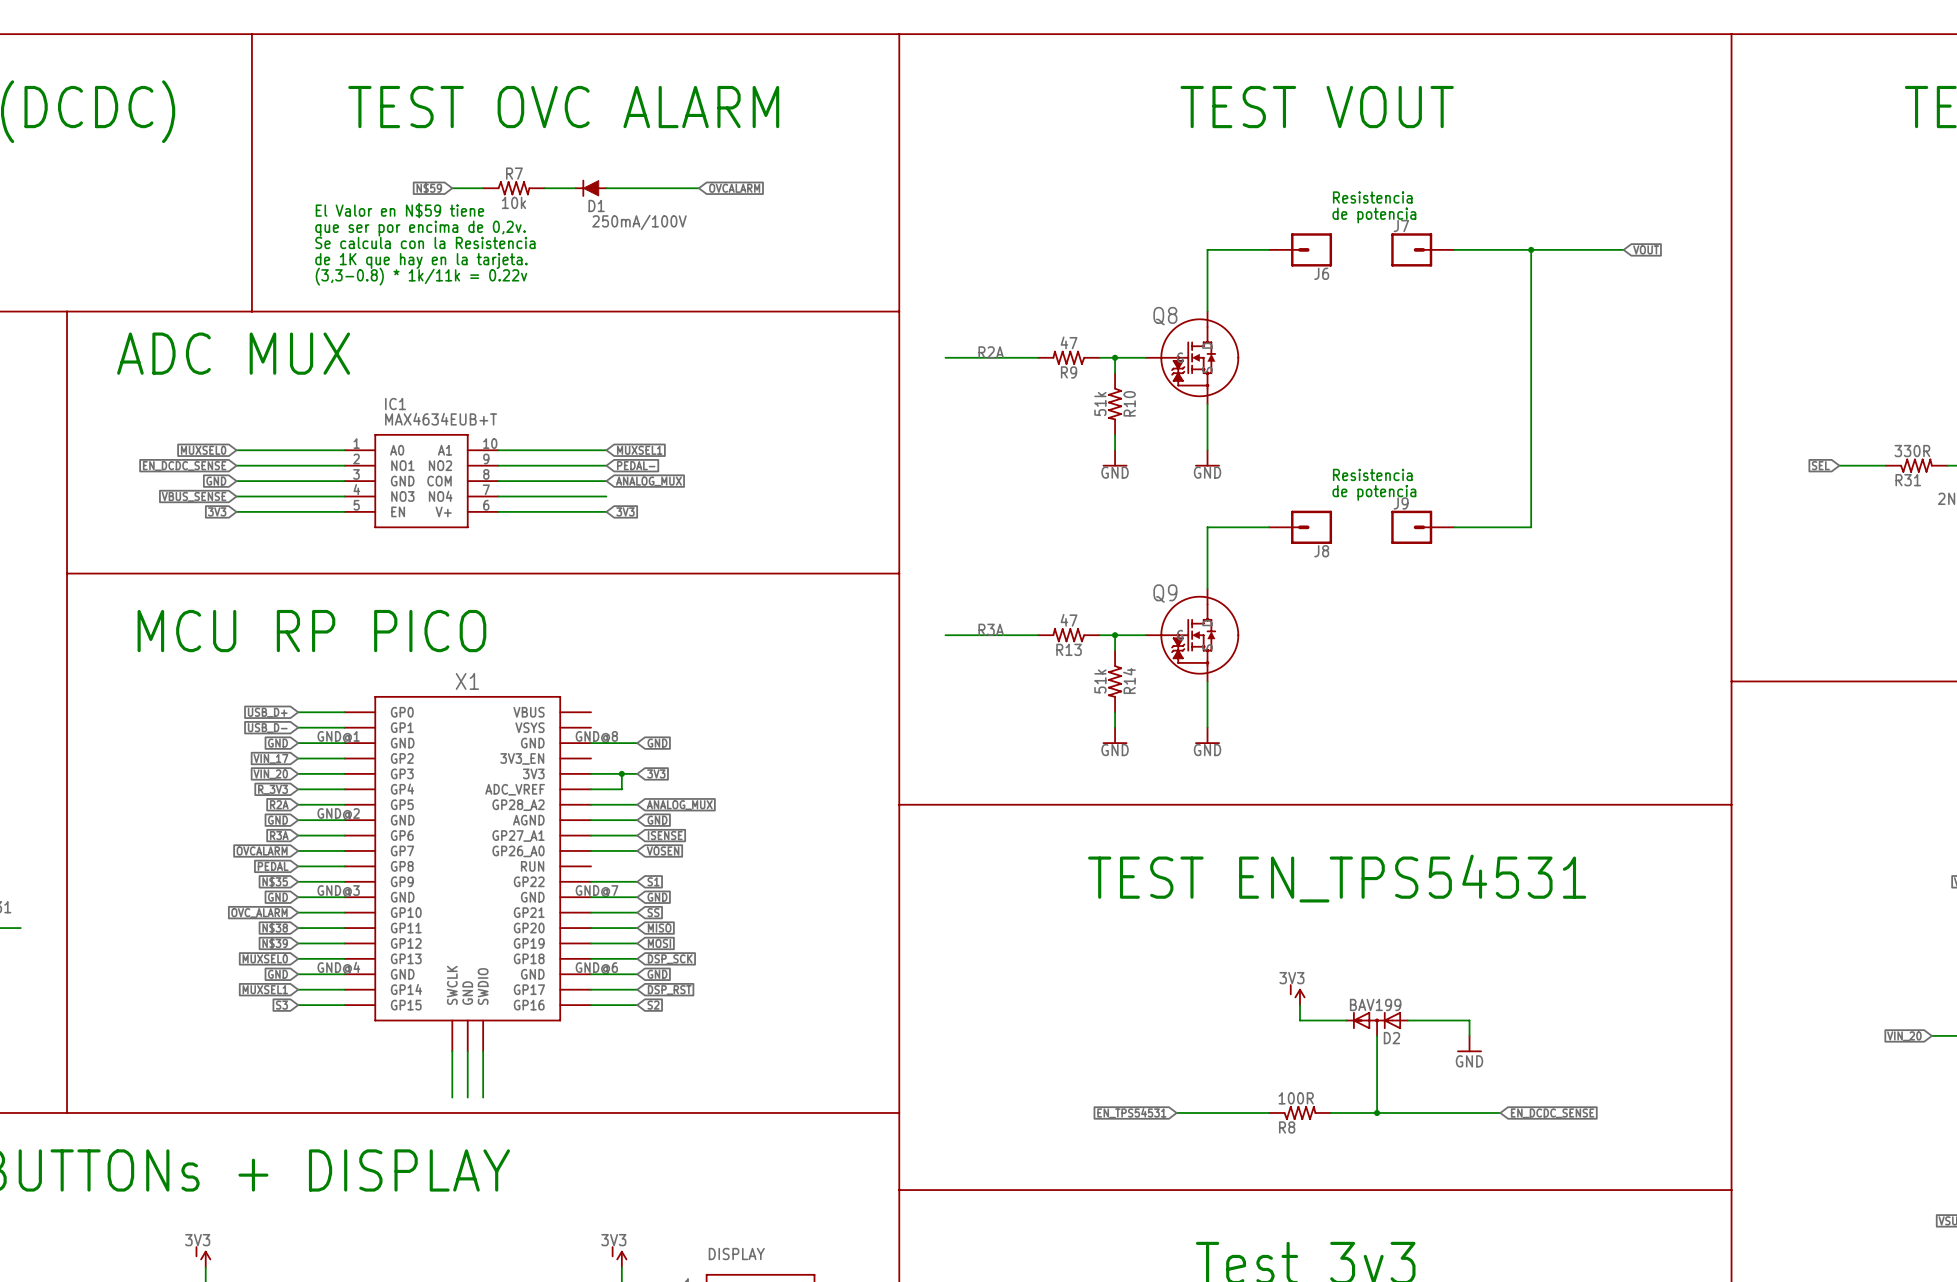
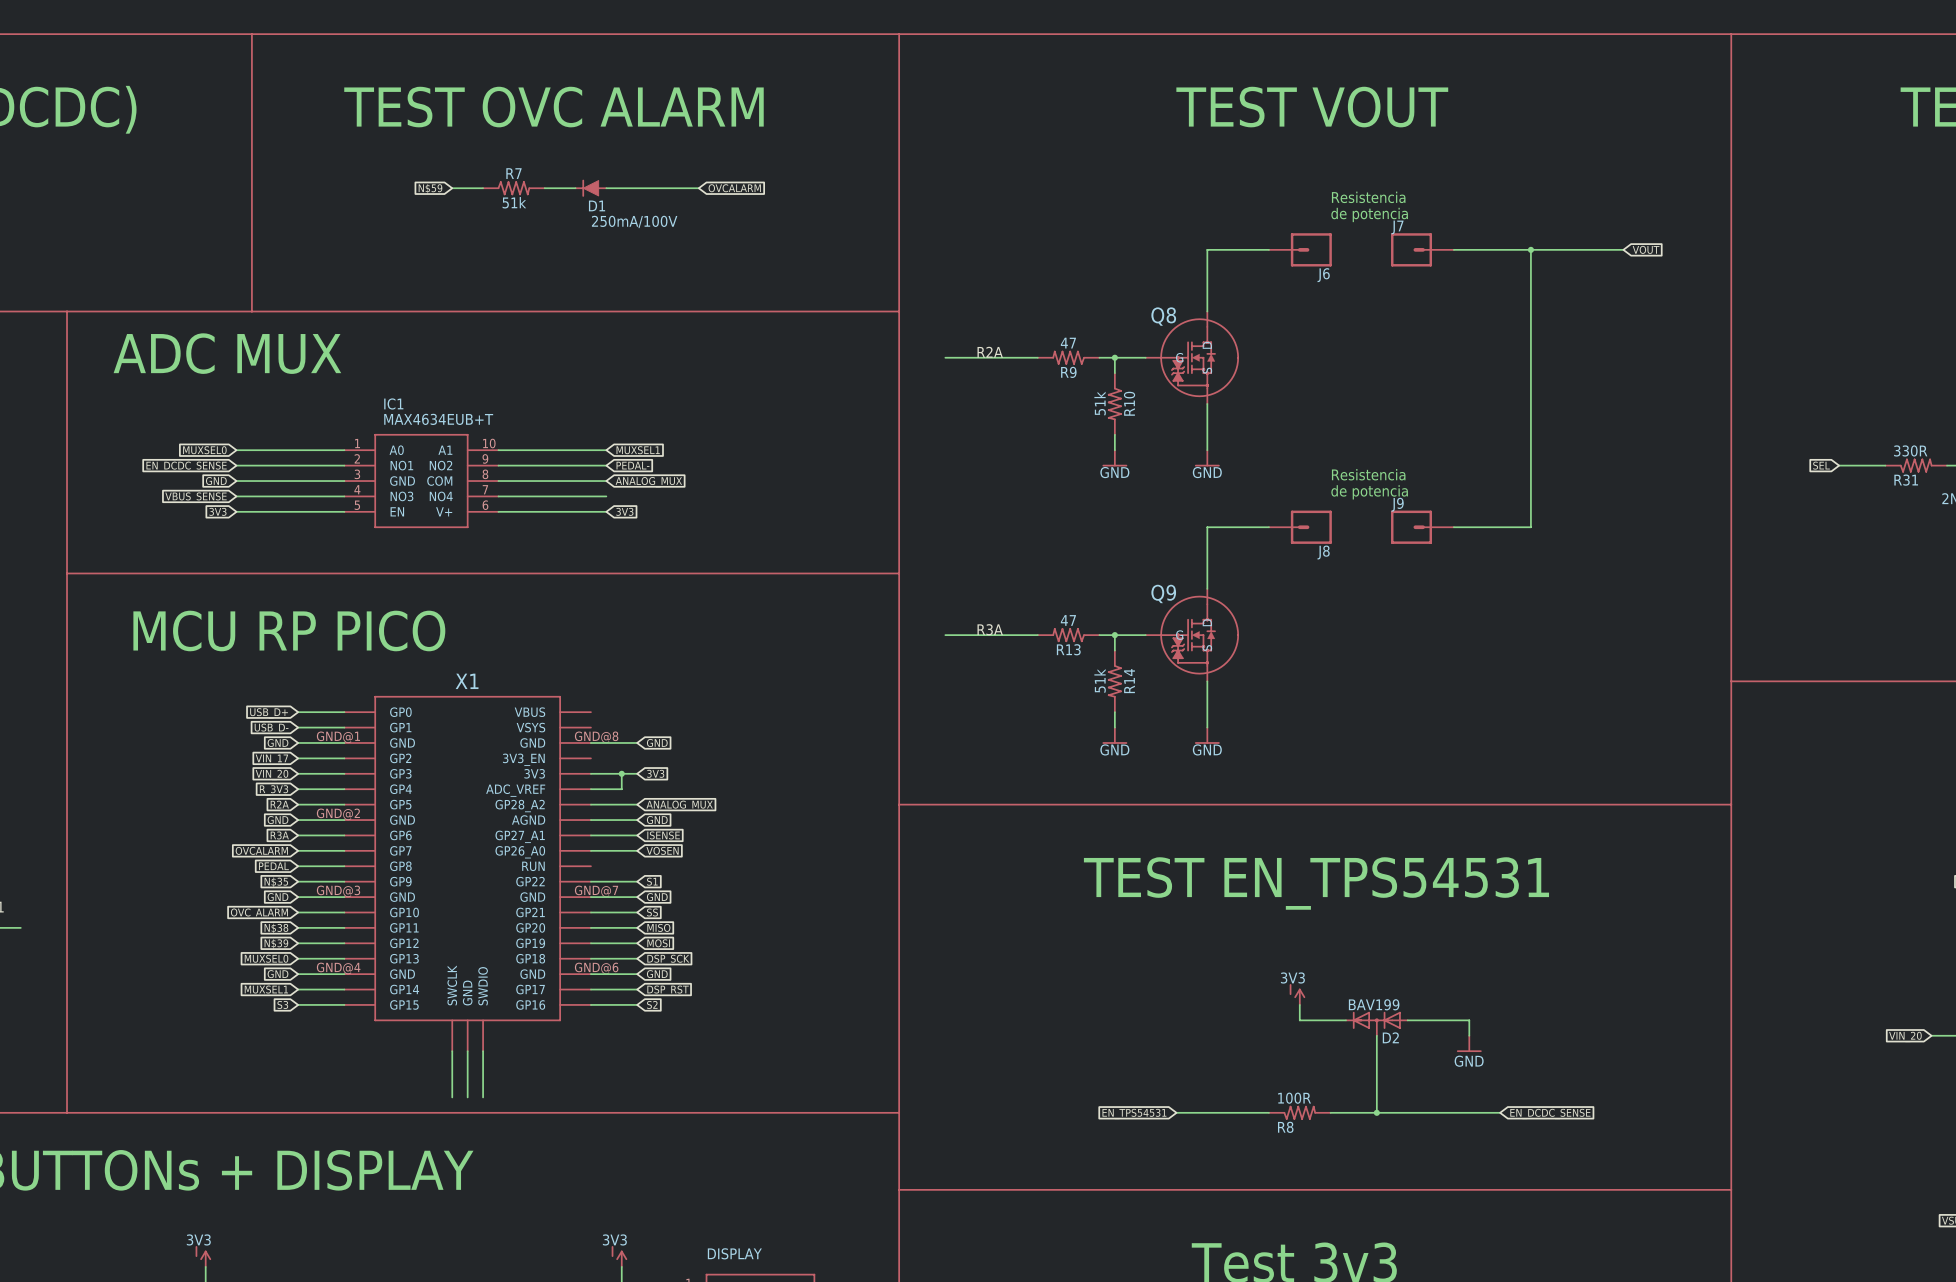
R7 value: 10k (513, 202) -> 51k (514, 202)
text: El Valor en N$59 tiene (399, 210) -> none
text: que ser por encima de 0,2v. (420, 228) -> none
text: Se calcula con la Resistencia (425, 242) -> none
text: de 1K que hay en la tarjeta. (421, 260) -> none
text: (3,3-0.8) * 1k/11k = 0.22v (421, 276) -> none

